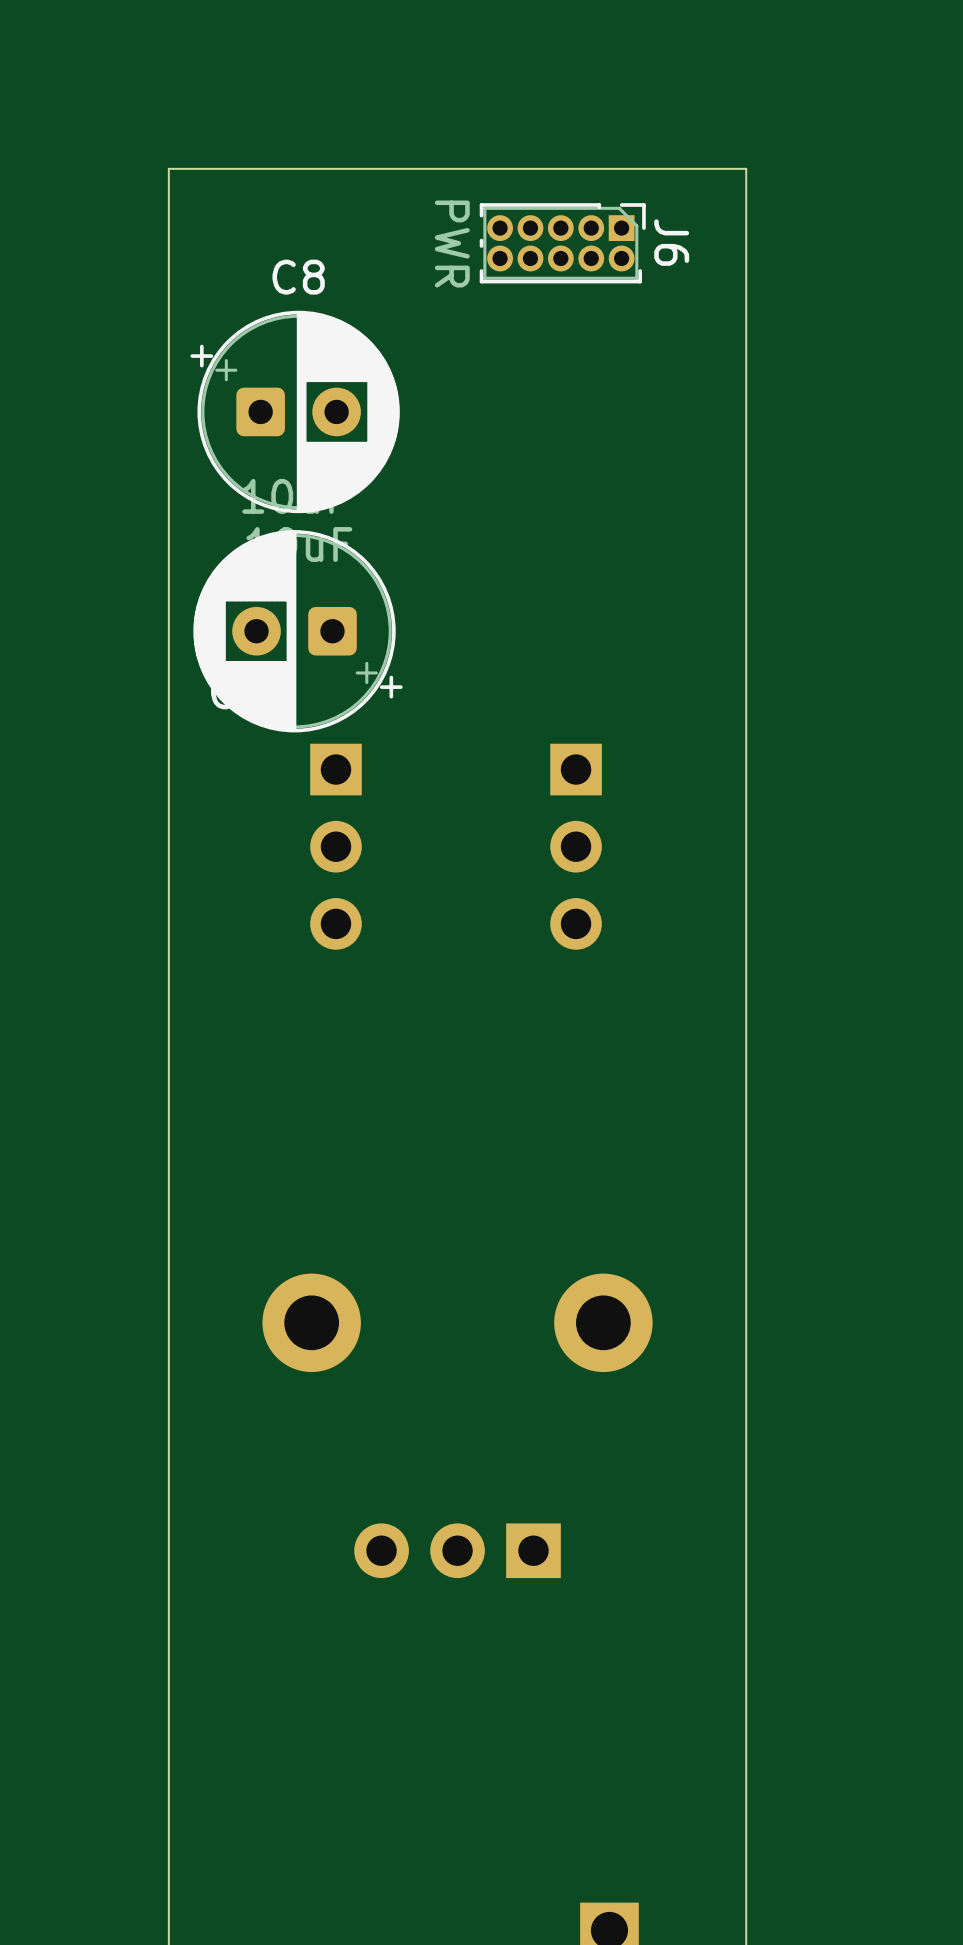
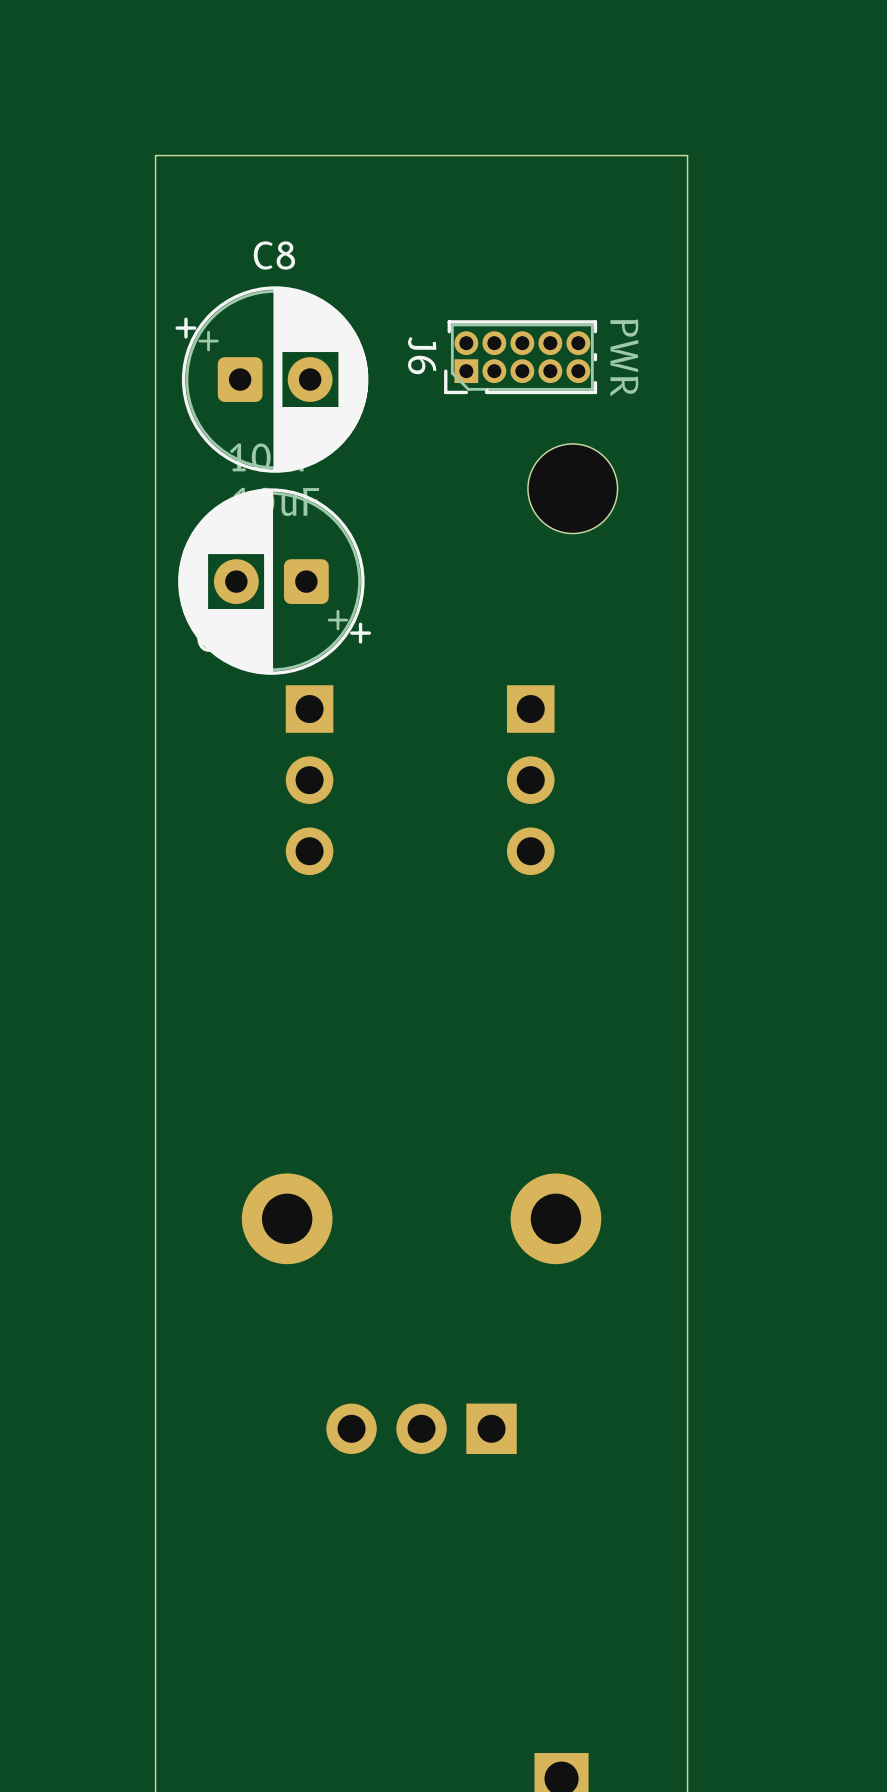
J6 rotation: 0° (562, 243) -> 180° (520, 357)
J6 position: (562, 243) -> (520, 357)
part: none -> (572, 488)

